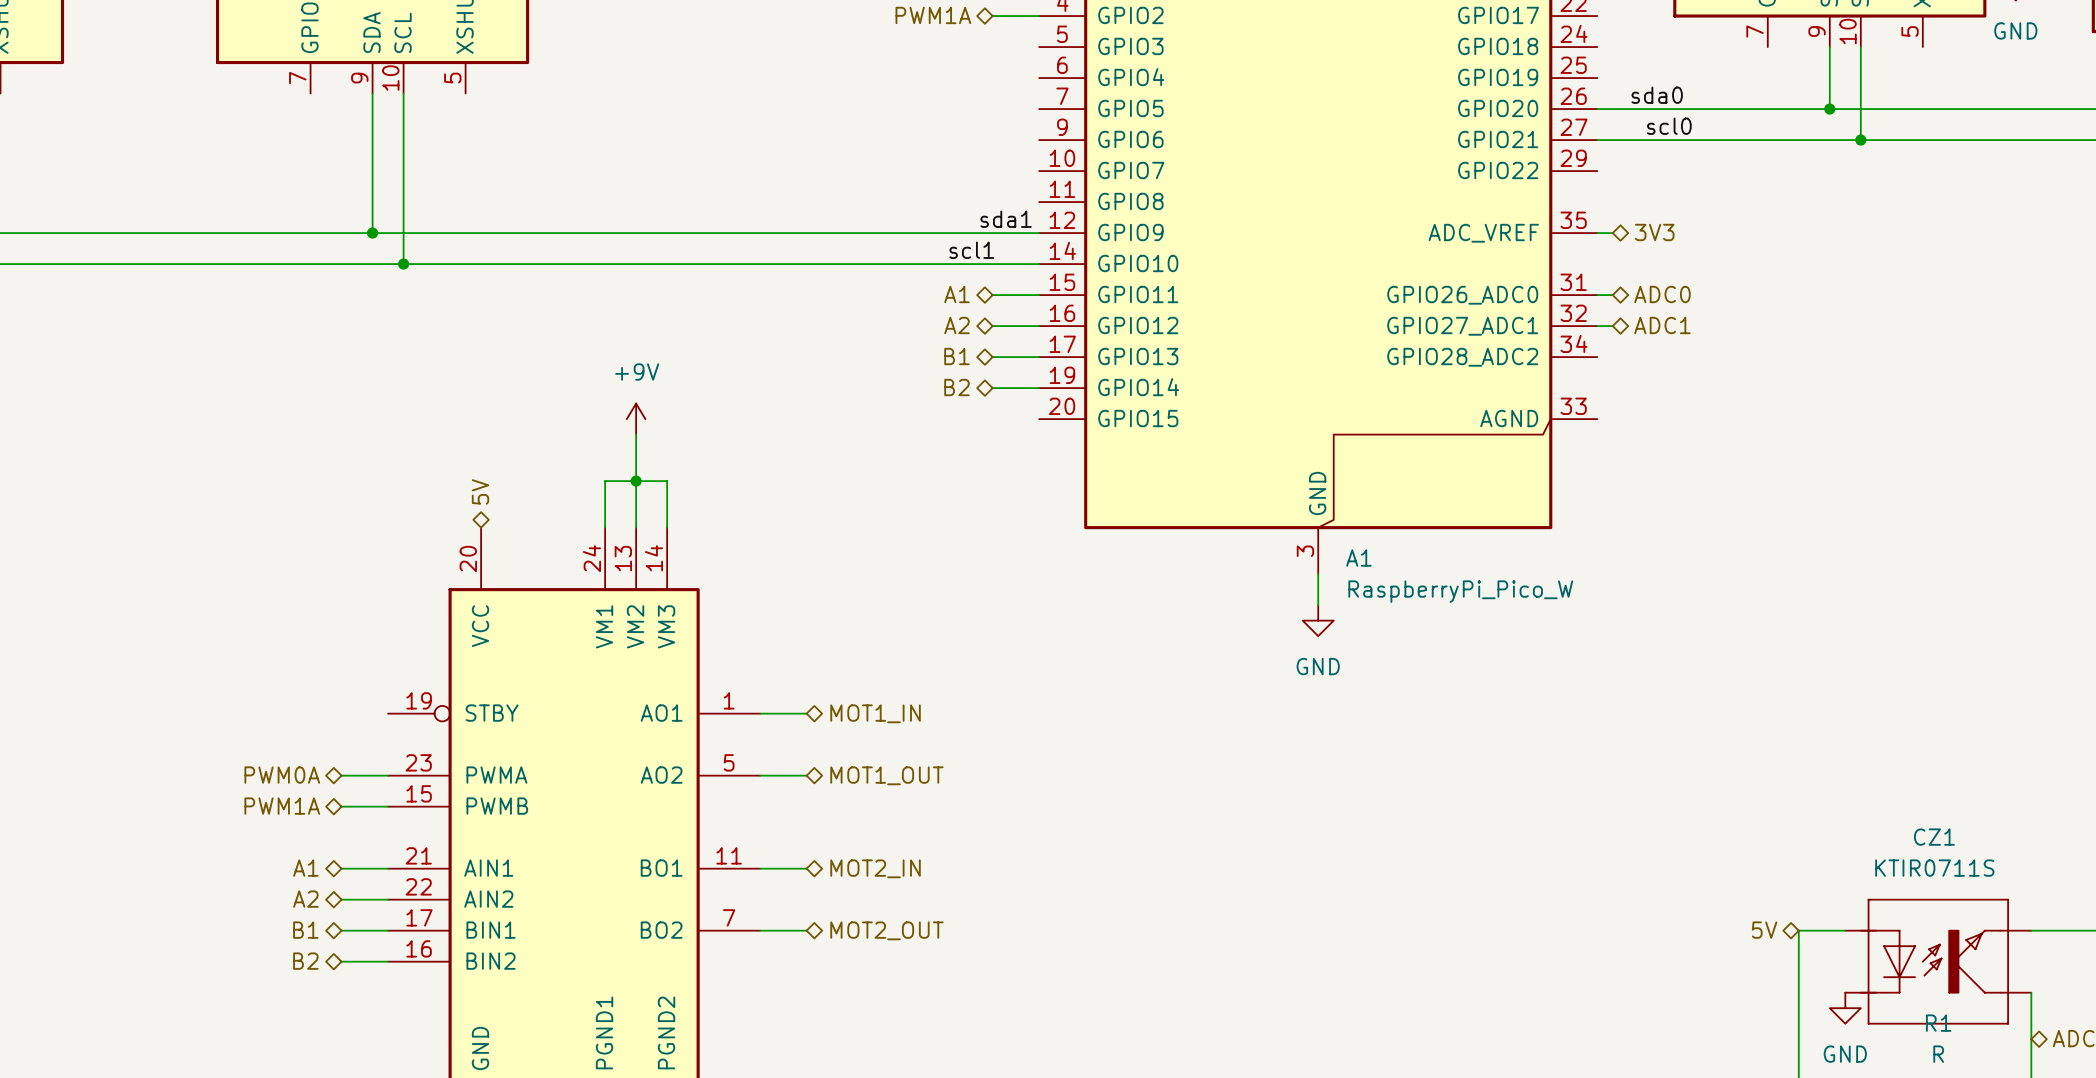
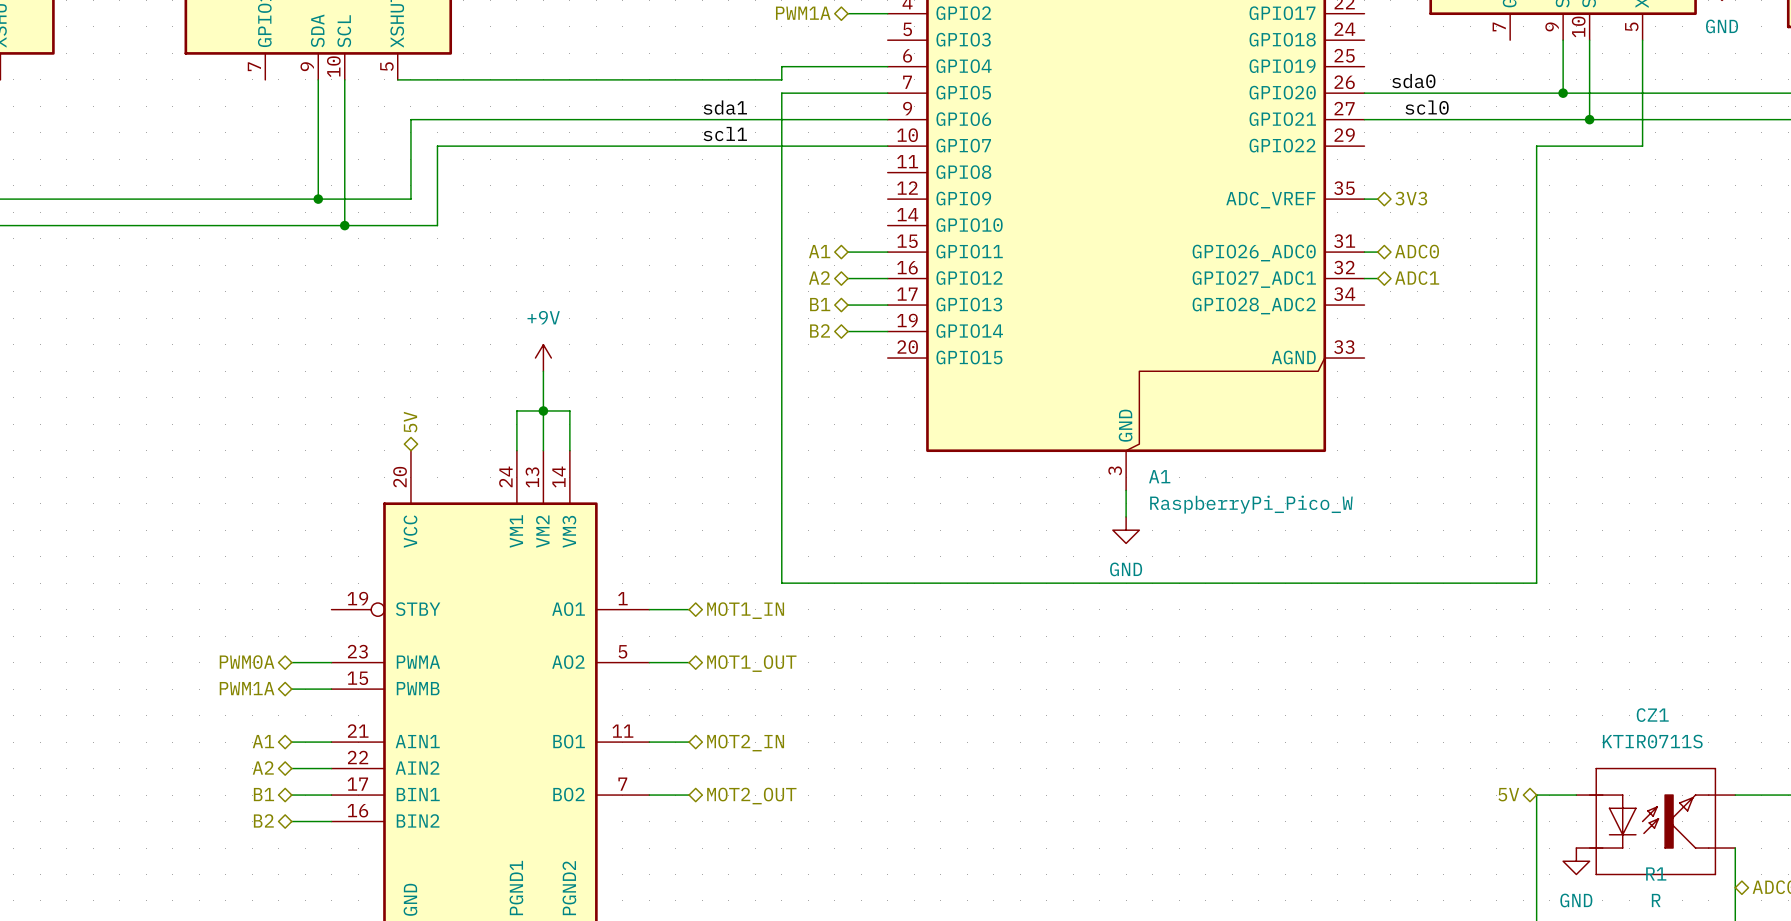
wire: none -> (1642, 40) (1642, 146) (1536, 146) (1536, 583) (781, 583) (781, 93) (887, 93)
wire: none -> (887, 66) (781, 66) (781, 79) (397, 79)
label position: sda1 (1006, 219) -> sda1 (725, 107)
wire: (481, 233) (1039, 233) -> (410, 199) (410, 119) (887, 119)
label position: scl1 (971, 250) -> scl1 (725, 134)
wire: (512, 264) (1039, 264) -> (437, 225) (437, 146) (887, 146)

